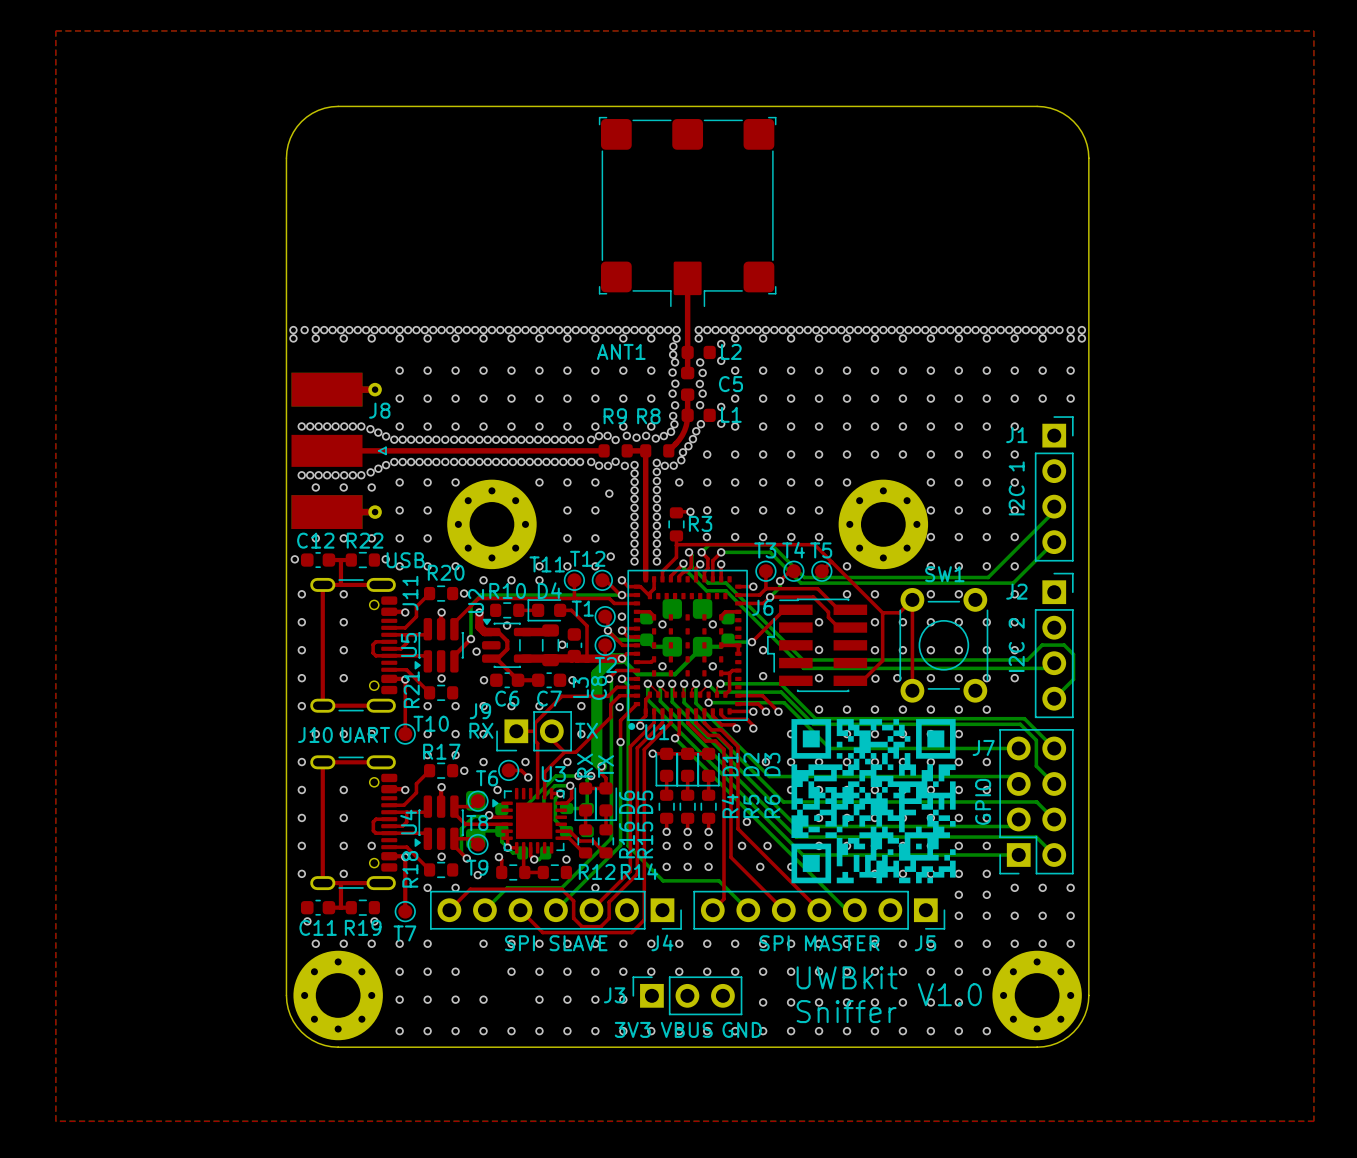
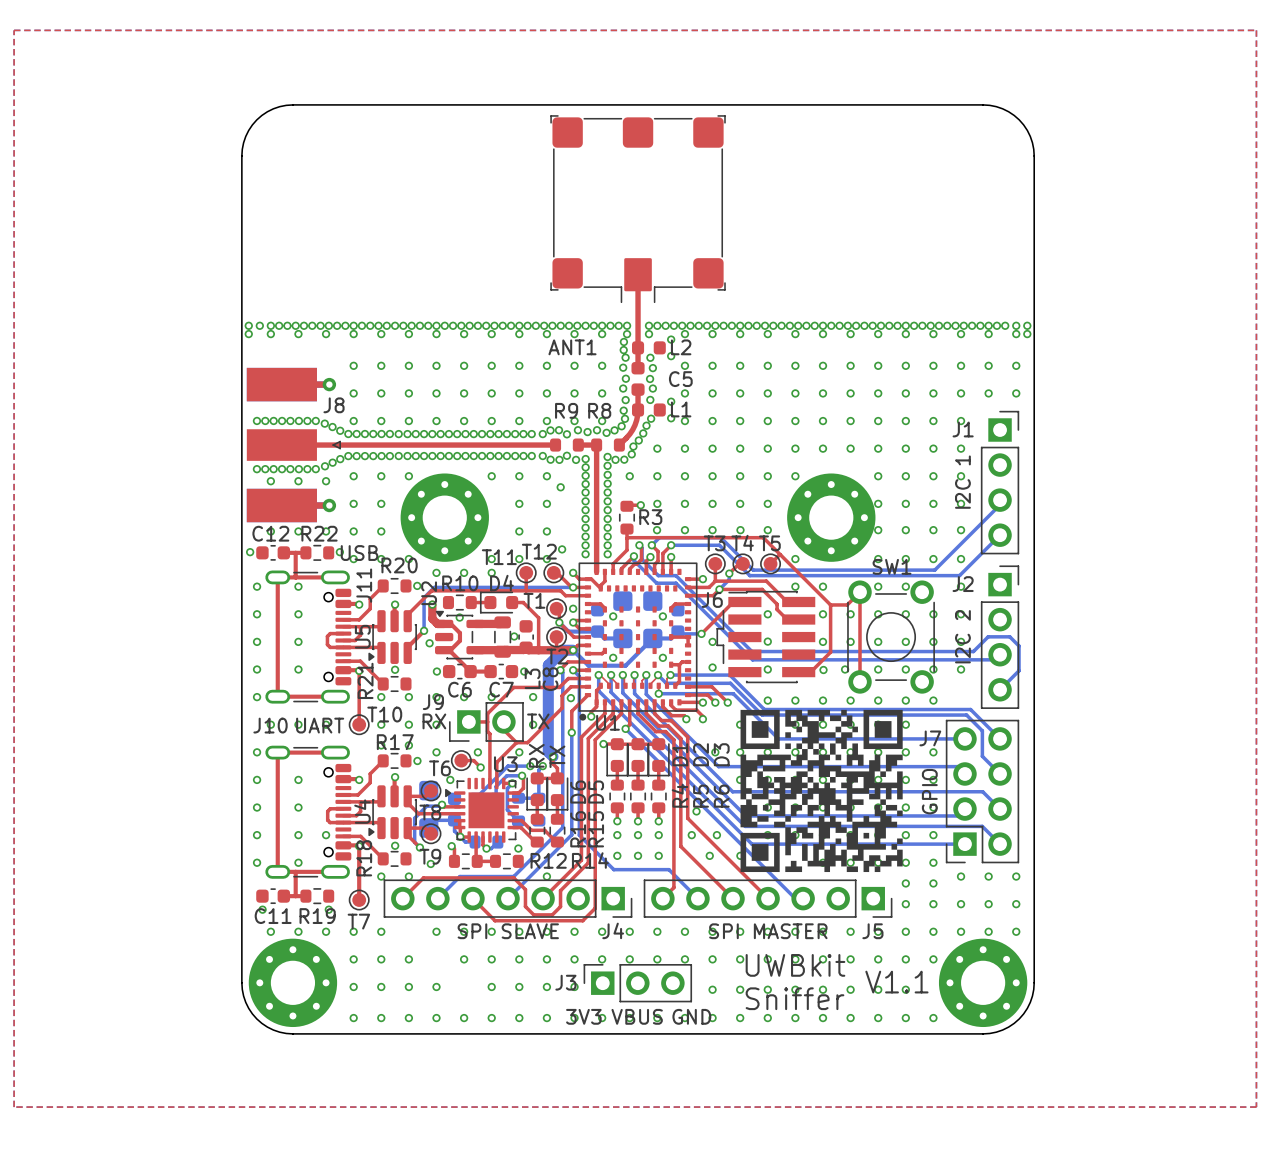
text: V1.0 (949, 994) -> V1.1 (896, 982)

